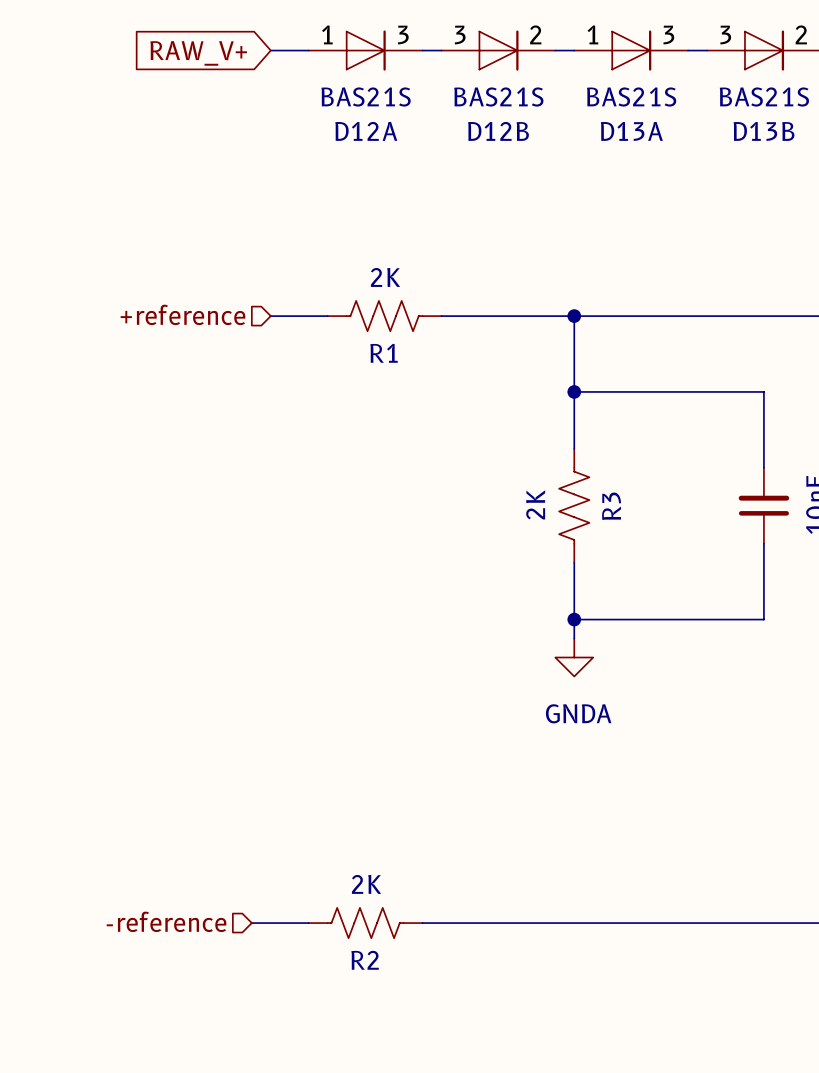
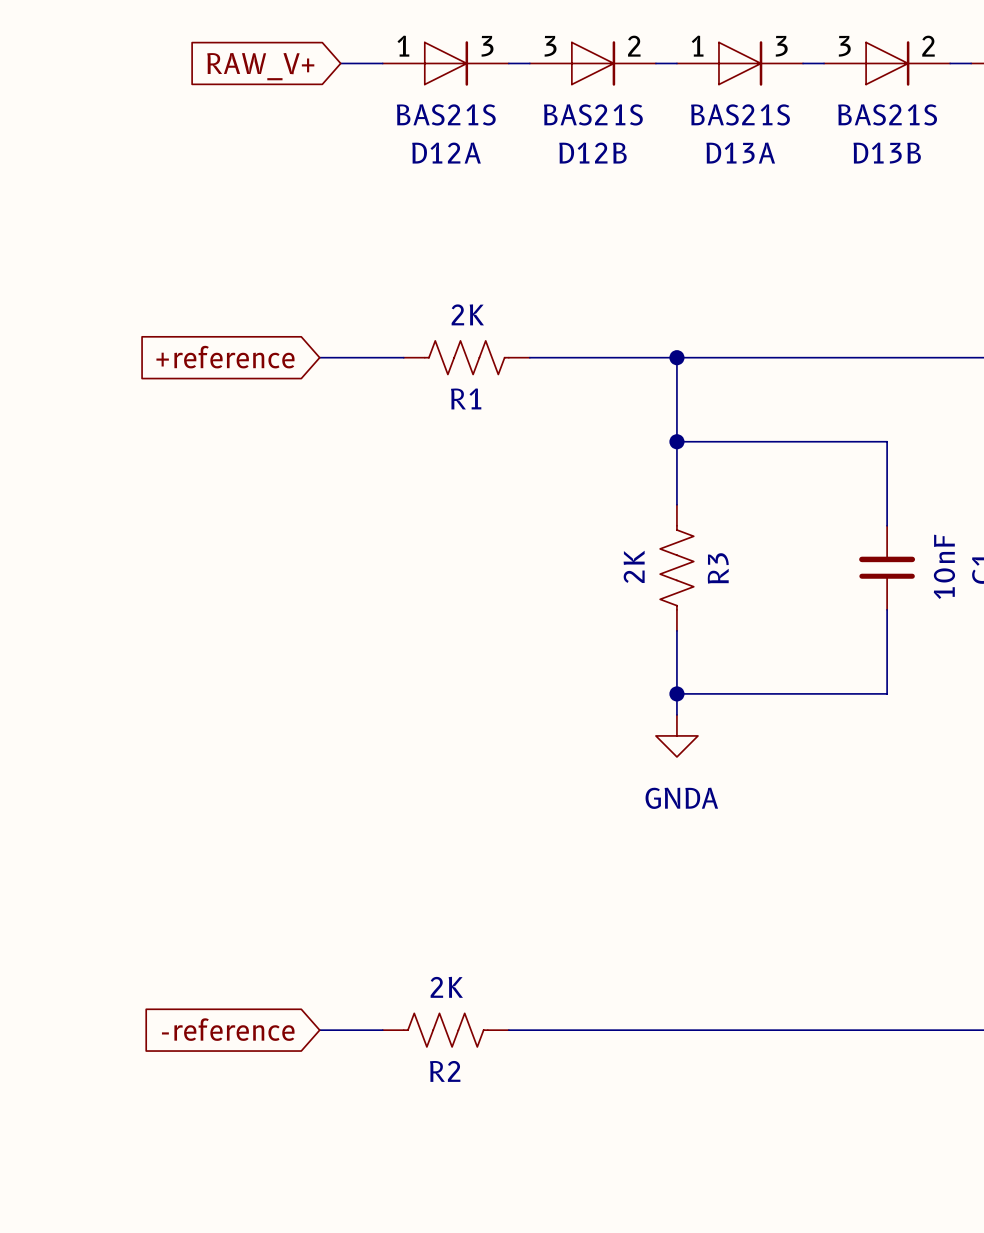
hierarchical label: +reference (183, 314) -> none
global label: none -> +reference (225, 357)
wire: none -> (319, 357) (340, 357)
hierarchical label: -reference (166, 921) -> none
global label: none -> -reference (228, 1029)

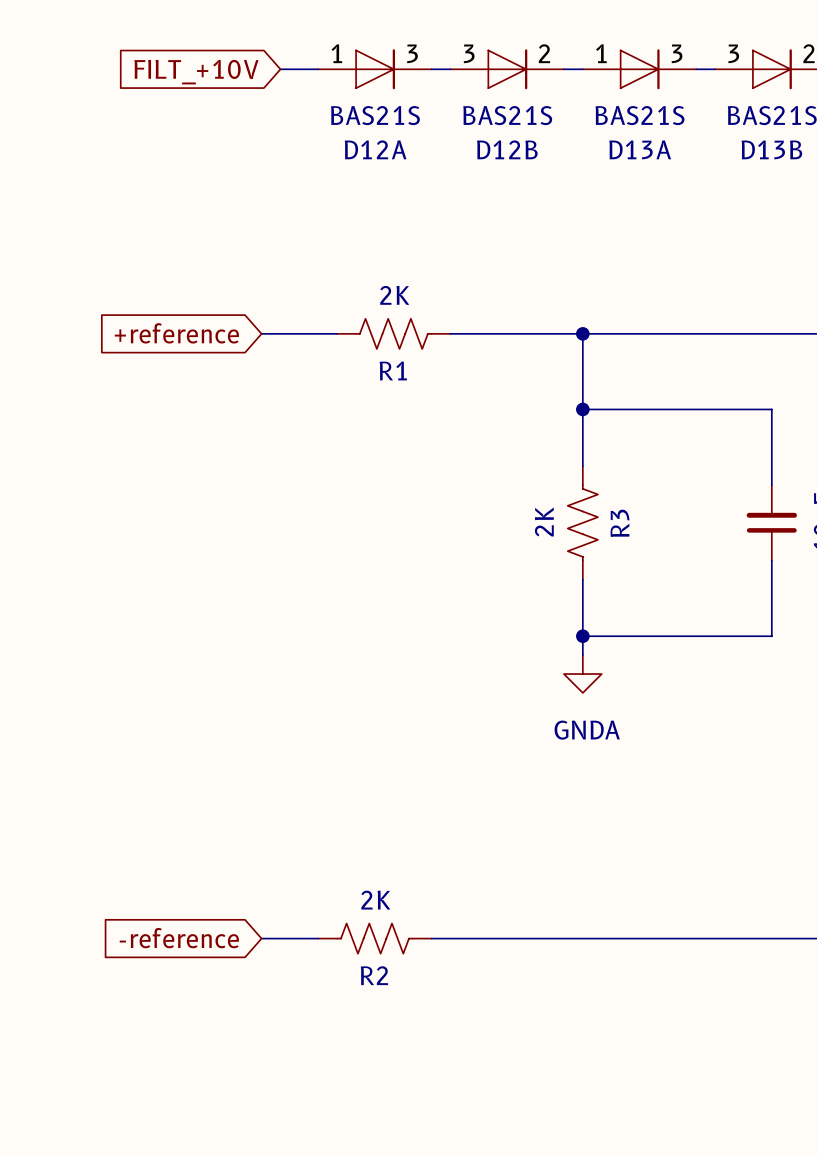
global label: RAW_V+ (260, 66) -> FILT_+10V (196, 72)

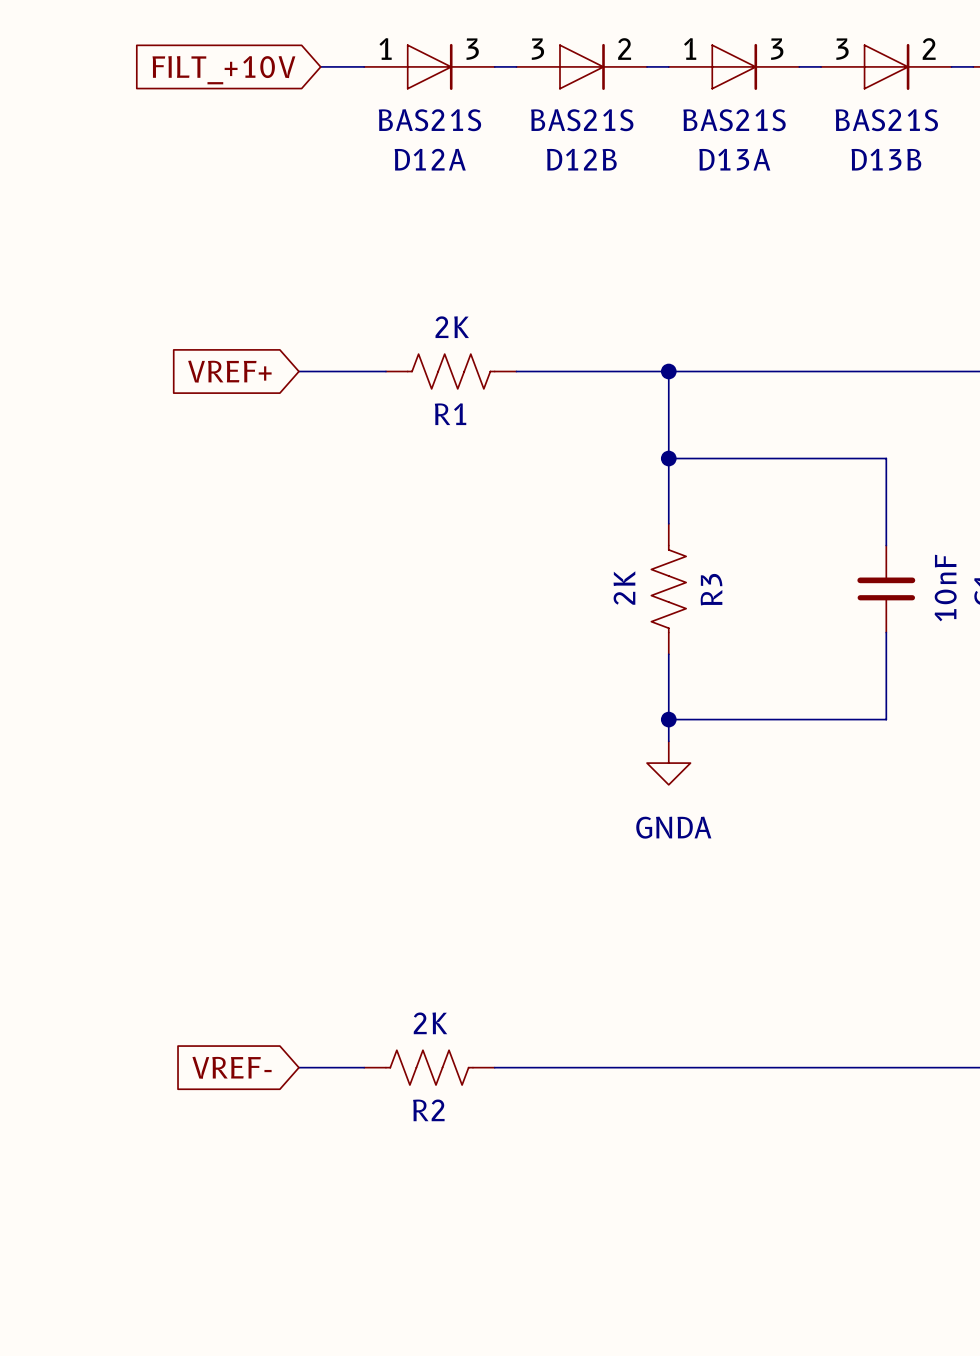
global label: +reference (176, 333) -> VREF+ (229, 371)
global label: -reference (179, 938) -> VREF- (232, 1067)

